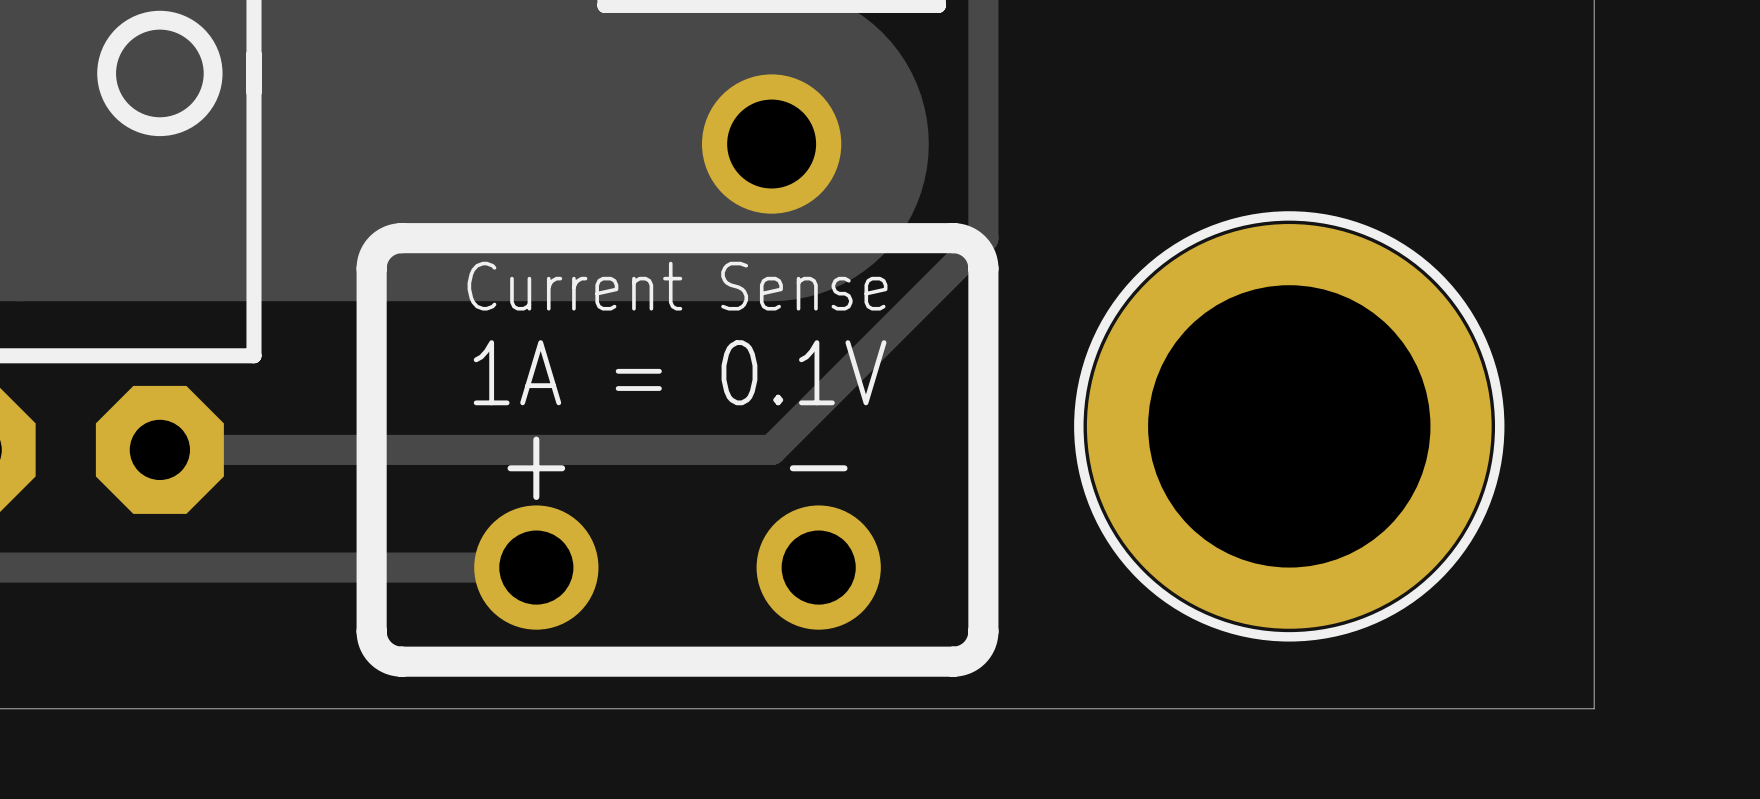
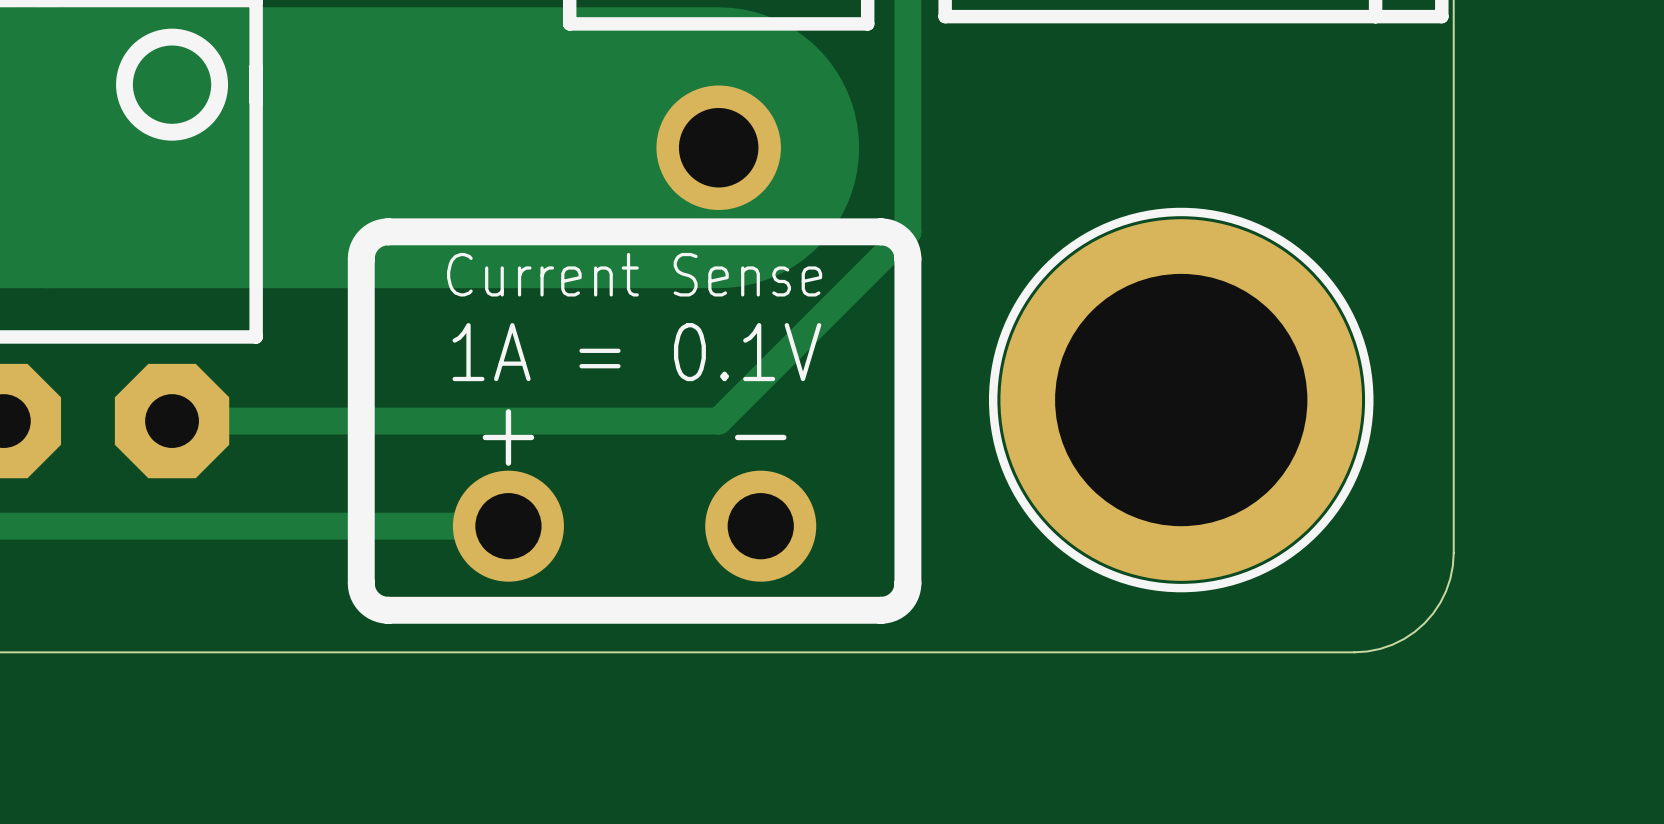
board edge: (1594, 597) (1594, 708) (1483, 708) -> (1453, 553) (1452, 565) (1446, 591) (1440, 602) (1424, 623) (1404, 639) (1392, 644) (1367, 651) (1354, 652)

